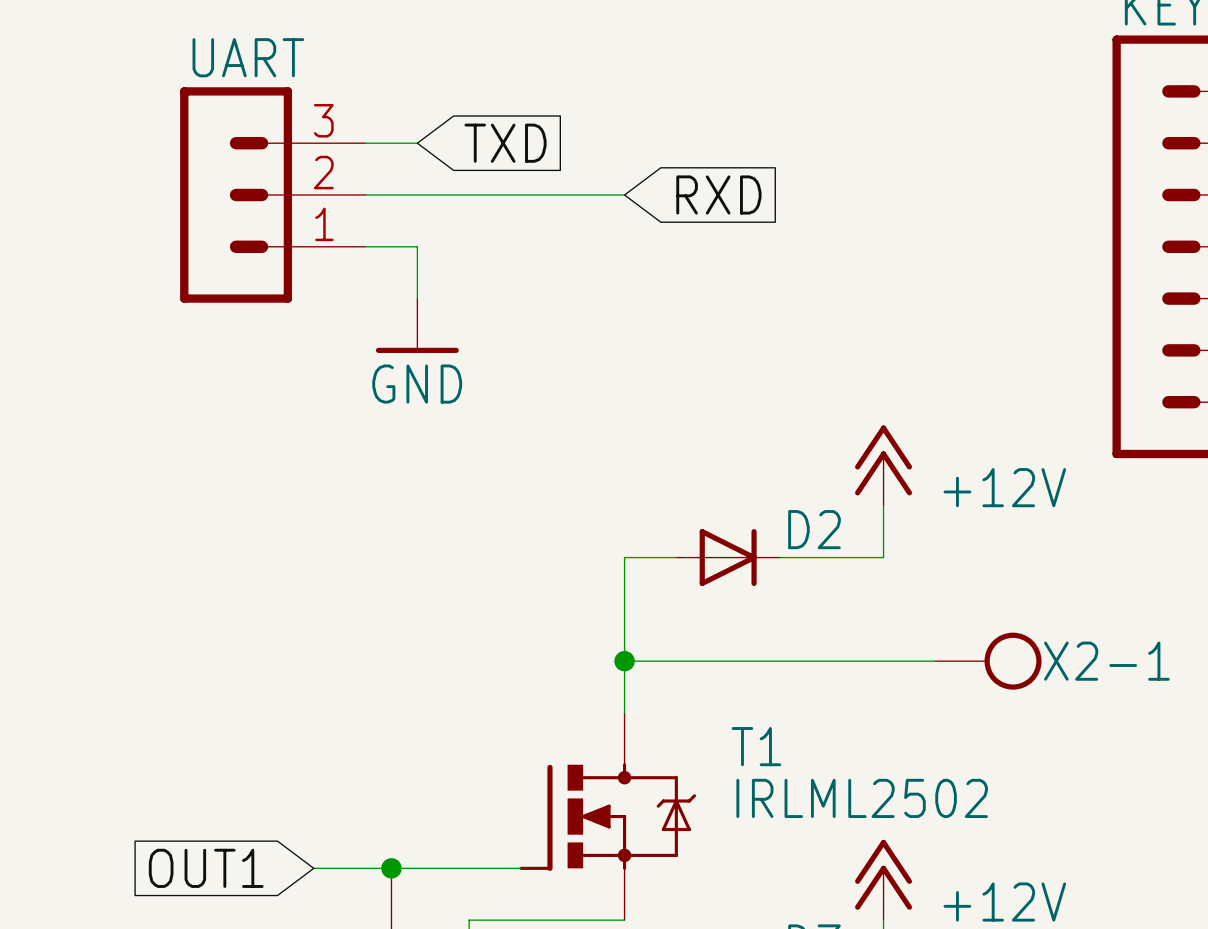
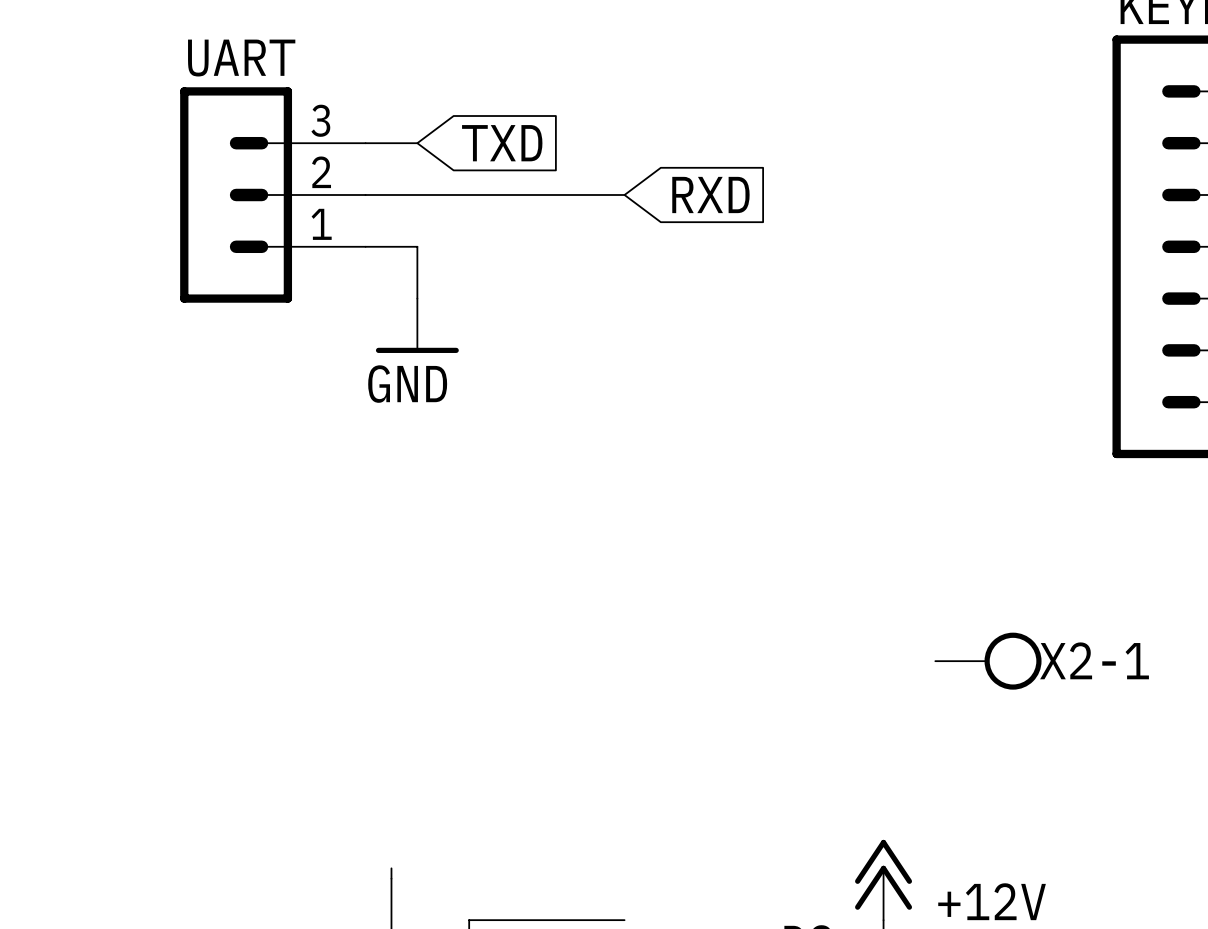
power symbol: +12V (883, 465) -> none
wire: (883, 505) (883, 557) (779, 557) -> none
wire: (676, 557) (624, 557) (624, 712) -> none
D2: (728, 557) -> none
wire: (624, 661) (935, 661) -> none
junction: (624, 661) -> none
T1: IRLML2502 (607, 816) -> none
global label: OUT1 (206, 868) -> none
wire: (313, 868) (520, 868) -> none
junction: (391, 868) -> none

